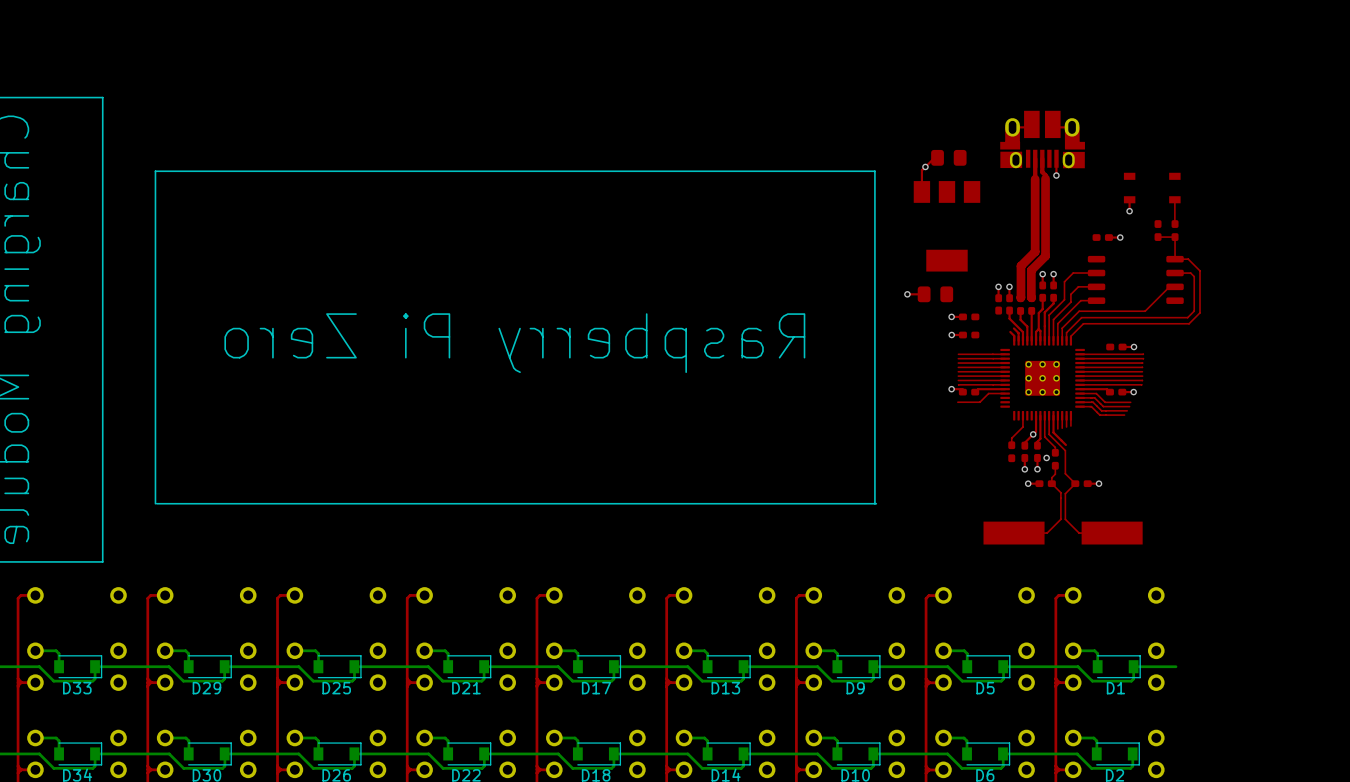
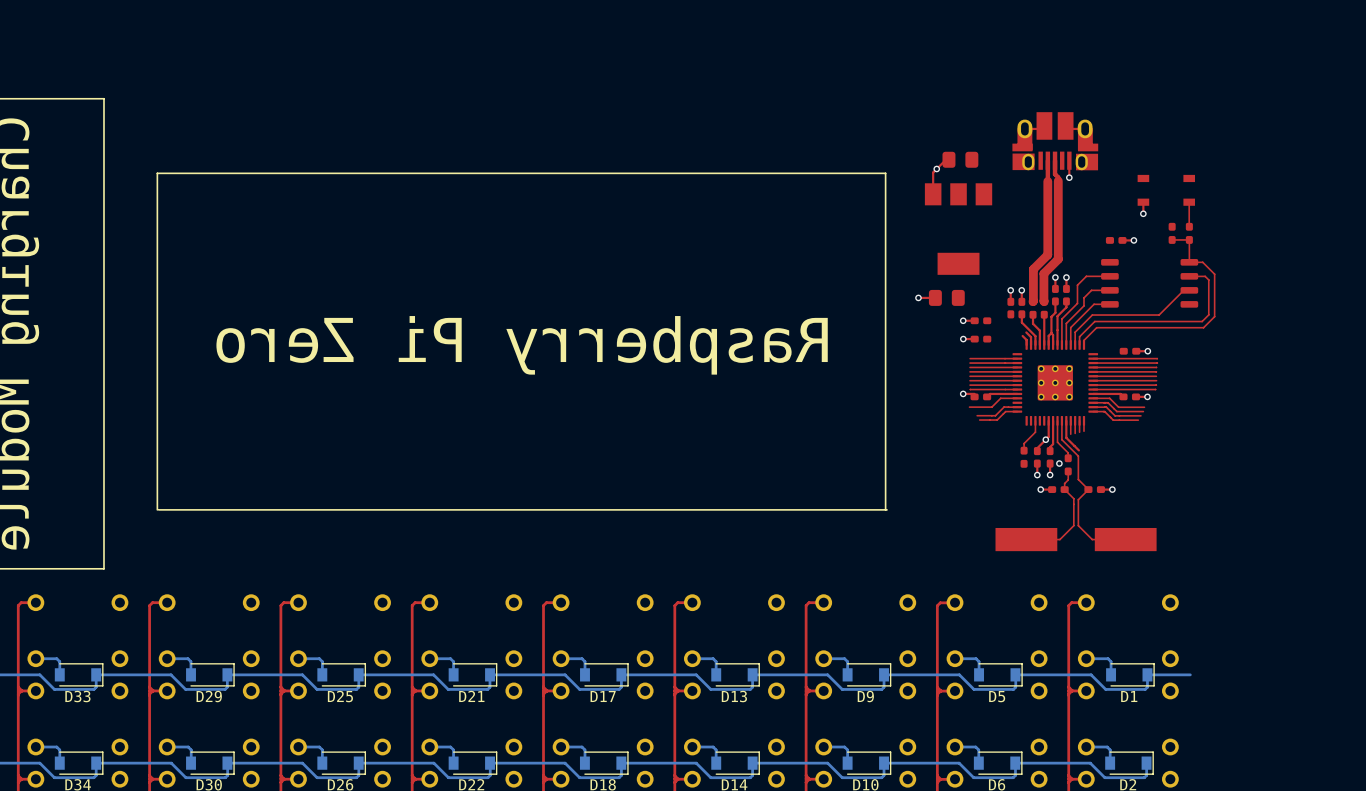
top track: none -> (1008, 407) (1004, 407) (995, 415) (977, 415)
top track: none -> (1017, 407) (1008, 407)
top track: none -> (1017, 411) (1005, 411) (997, 420) (979, 420)

